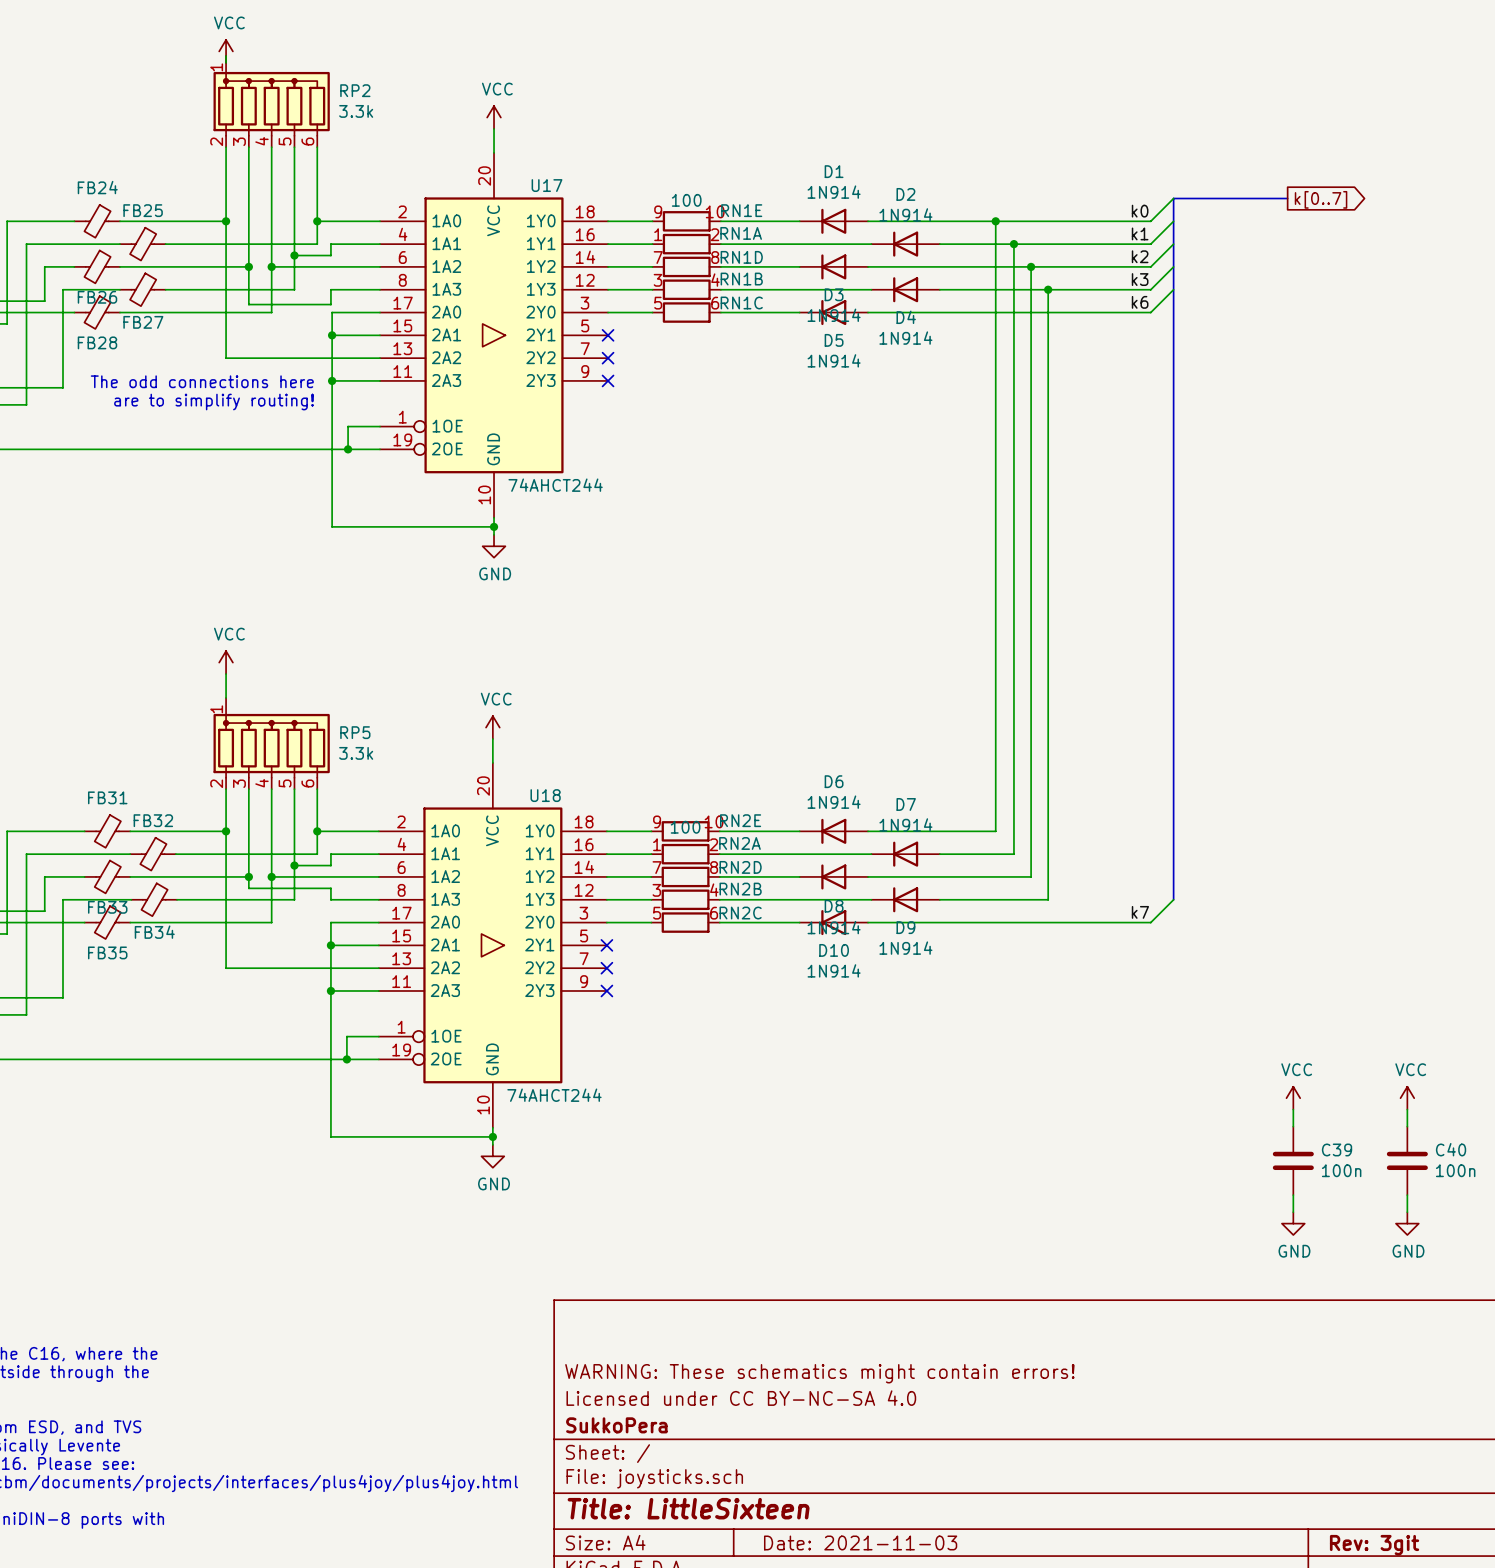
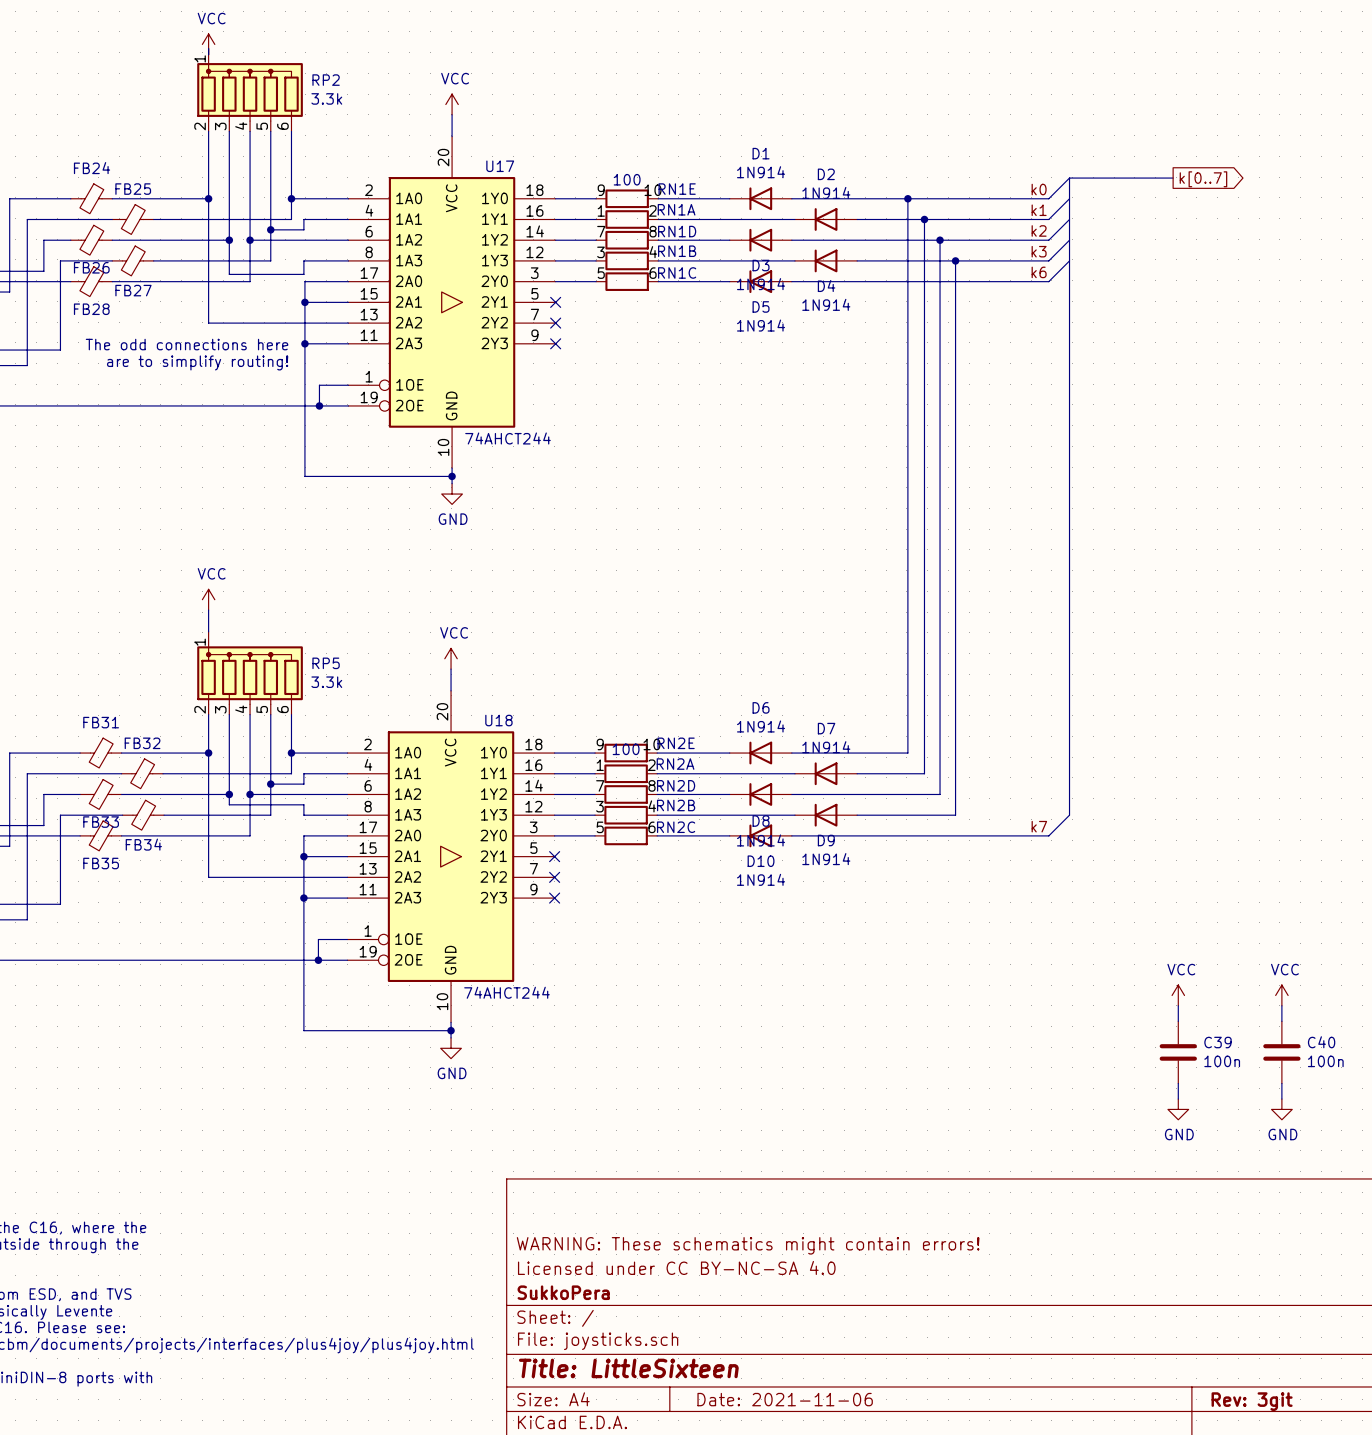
title block: Date: 2021-11-03 (860, 1542) -> Date: 2021-11-06 (785, 1399)

